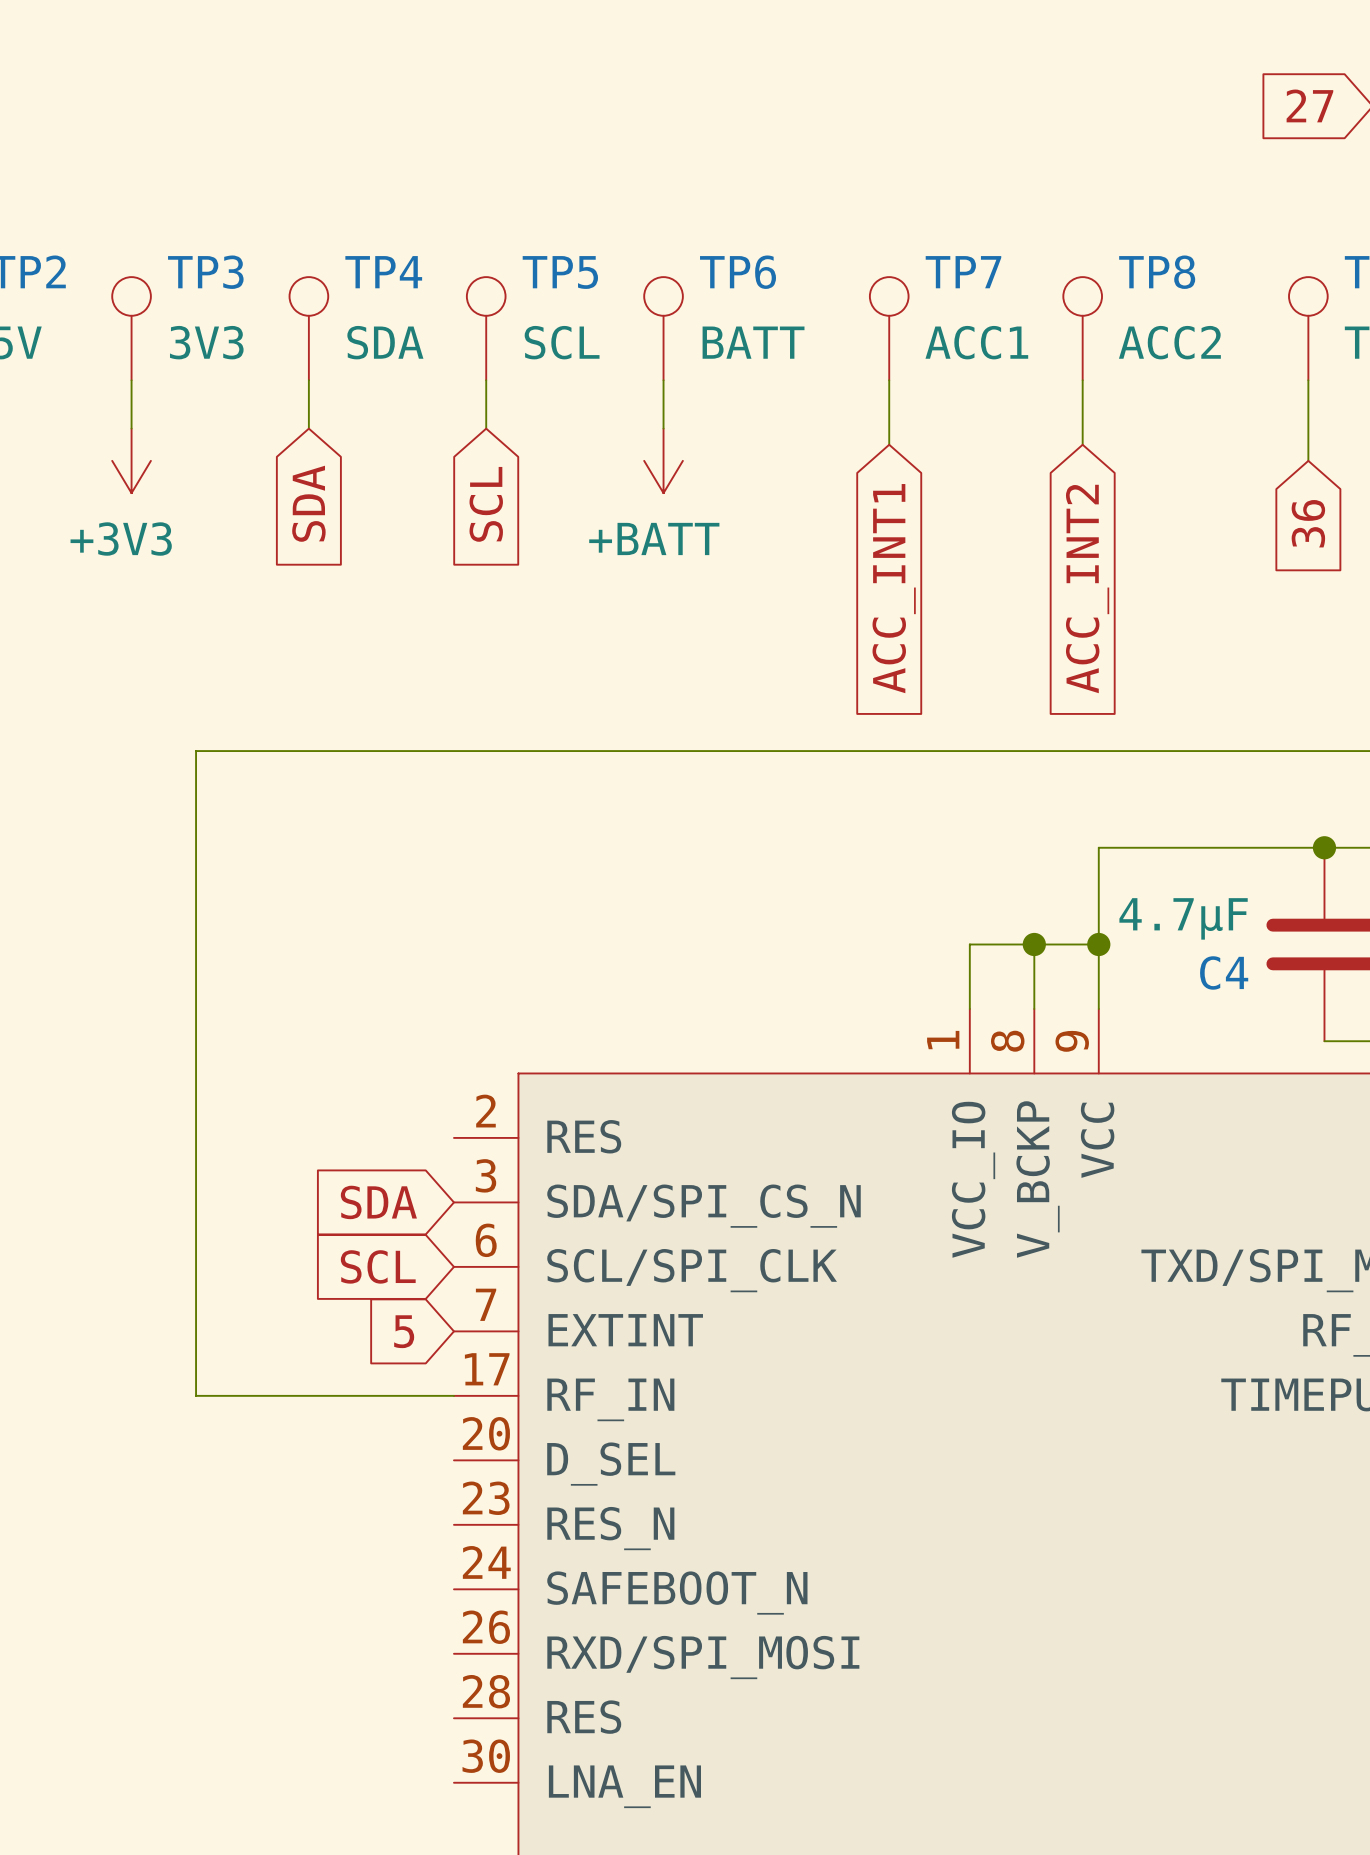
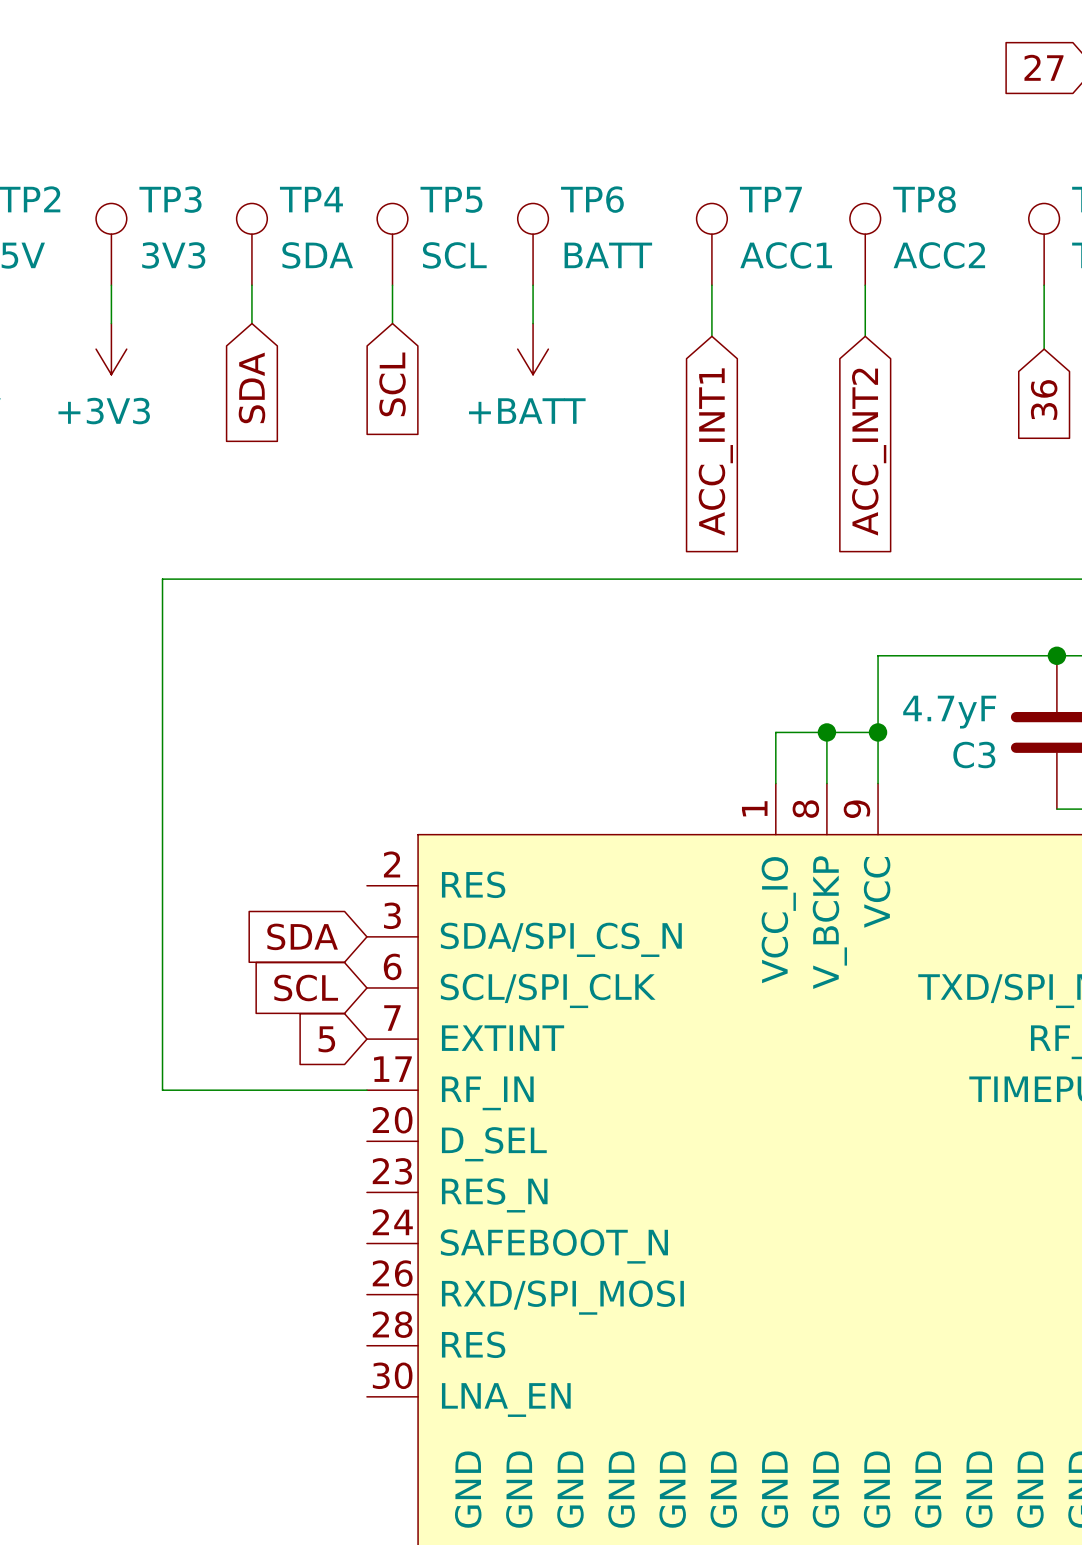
C4 value: 4.7µF (1183, 918) -> 4.7yF (949, 712)
C4 name: C4 (1224, 972) -> C3 (974, 755)

